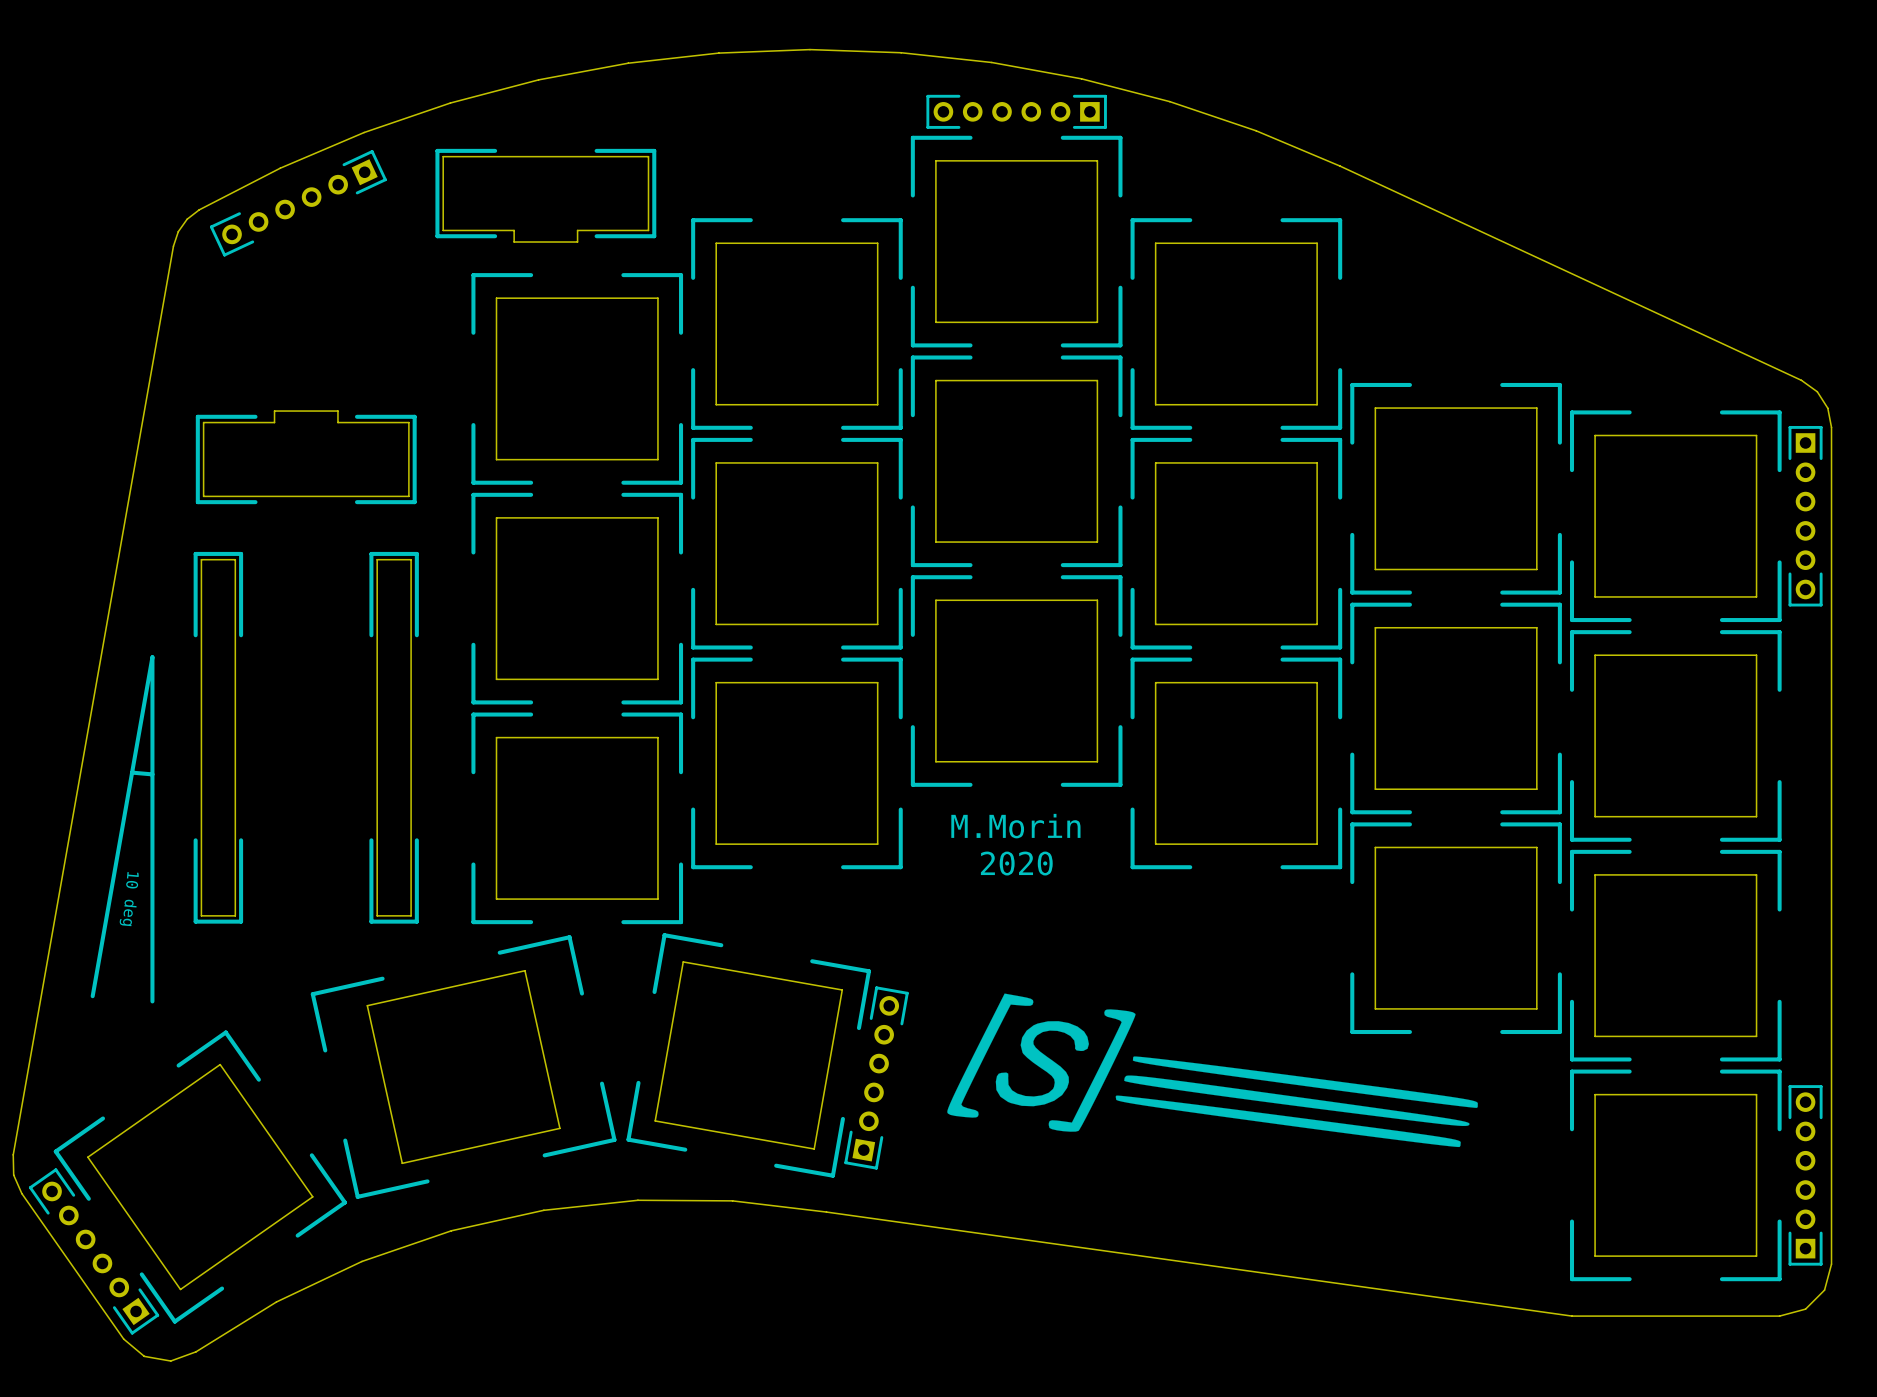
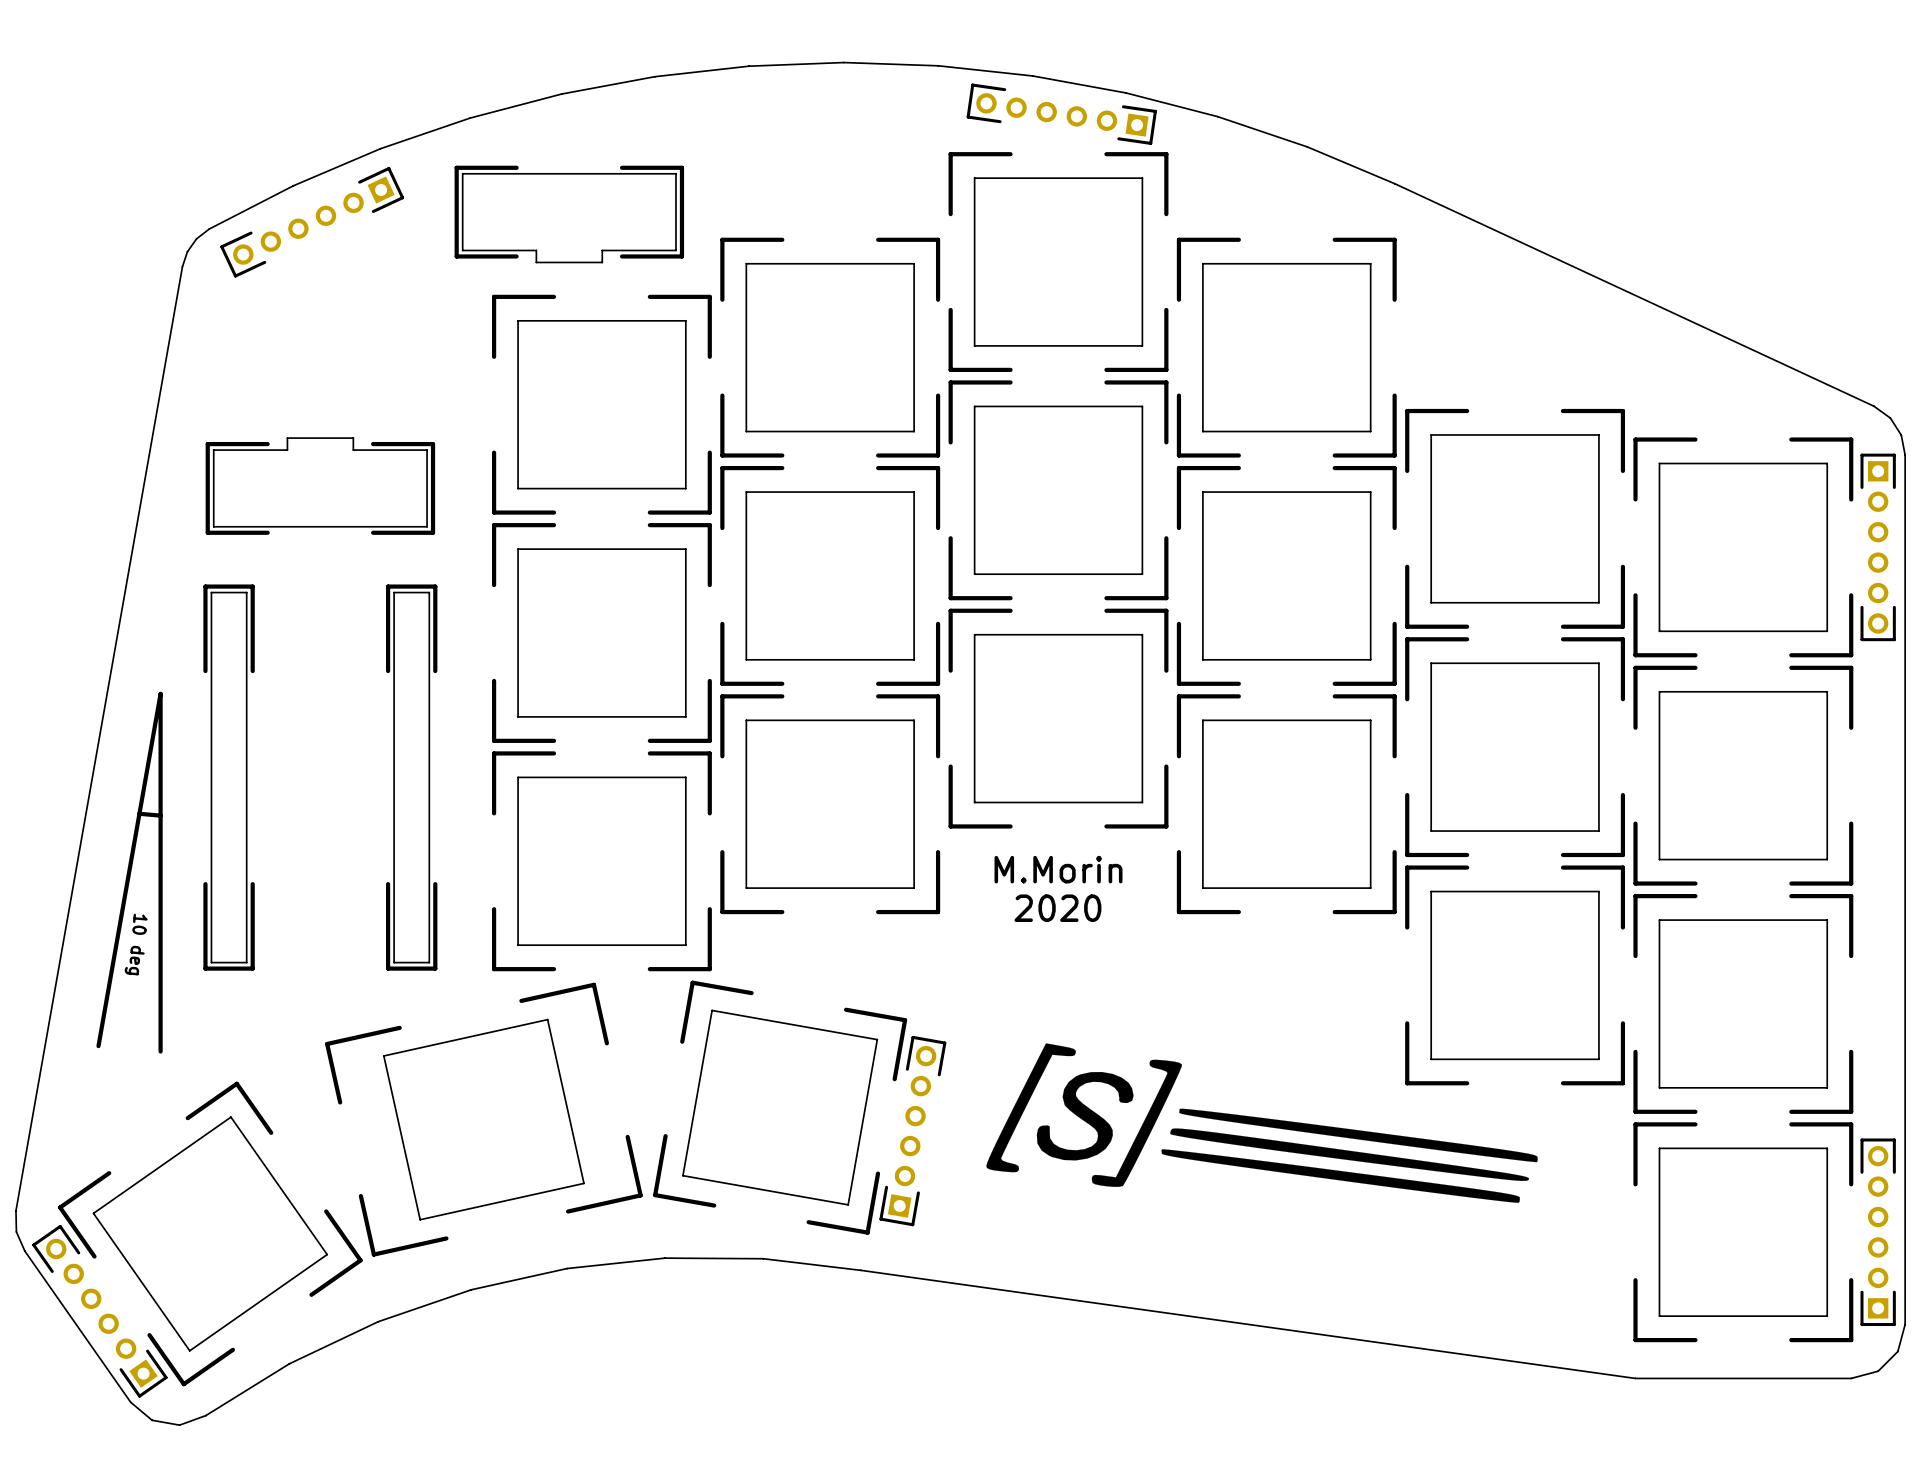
part: none -> (1061, 114)
part: (1016, 111) -> none

